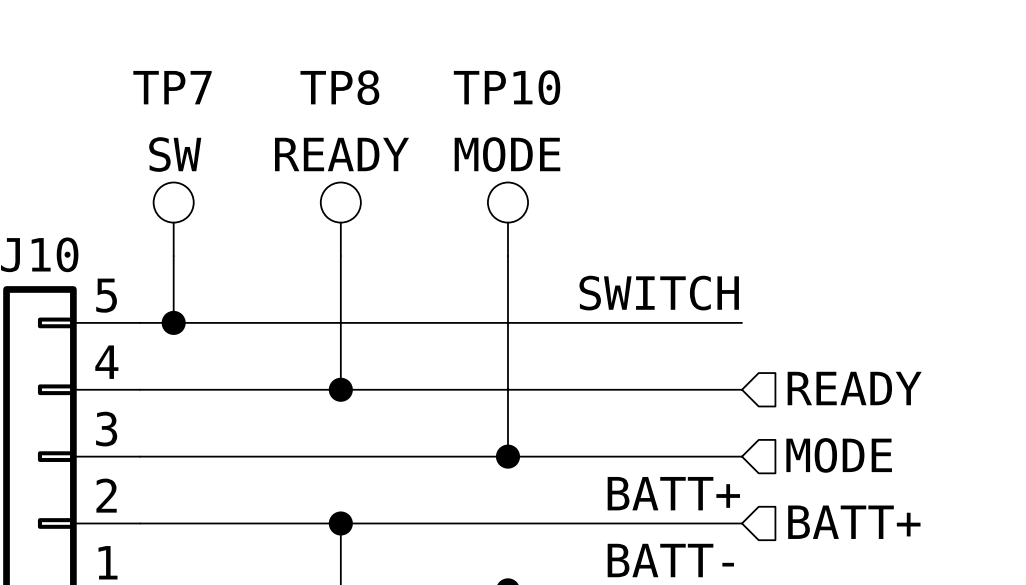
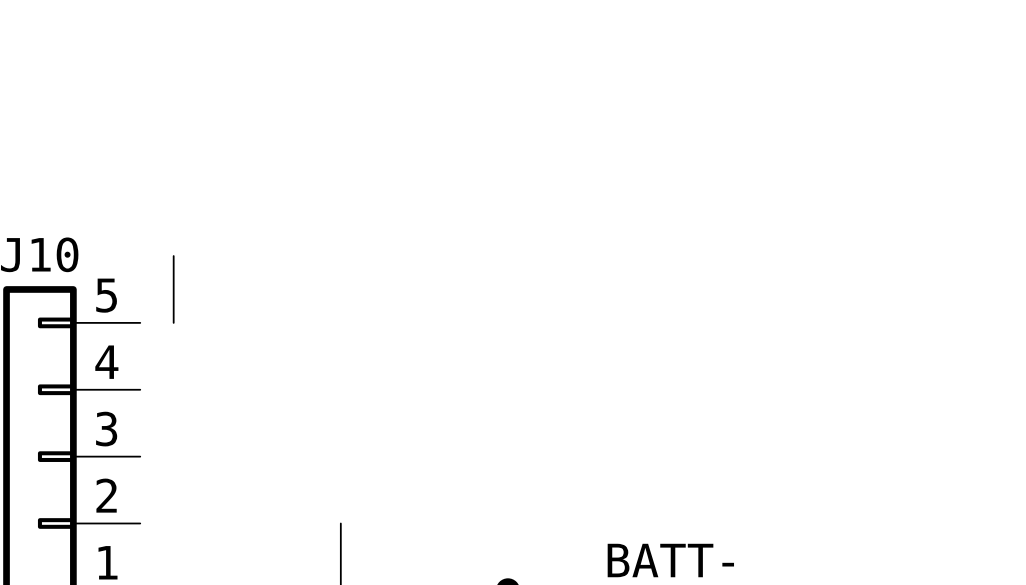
TP7: (173, 219) -> none
TP8: (340, 219) -> none
TP10: (507, 219) -> none
wire: (340, 256) (340, 389) -> none
wire: (507, 256) (507, 456) -> none
label: SWITCH (659, 293) -> none
wire: (140, 322) (742, 322) -> none
junction: (173, 322) -> none
hierarchical label: READY (854, 388) -> none
wire: (140, 389) (742, 389) -> none
junction: (340, 389) -> none
hierarchical label: MODE (839, 455) -> none
wire: (140, 456) (742, 456) -> none
junction: (507, 456) -> none
label: BATT+ (673, 493) -> none
hierarchical label: BATT+ (854, 522) -> none
wire: (140, 523) (742, 523) -> none
junction: (340, 523) -> none

